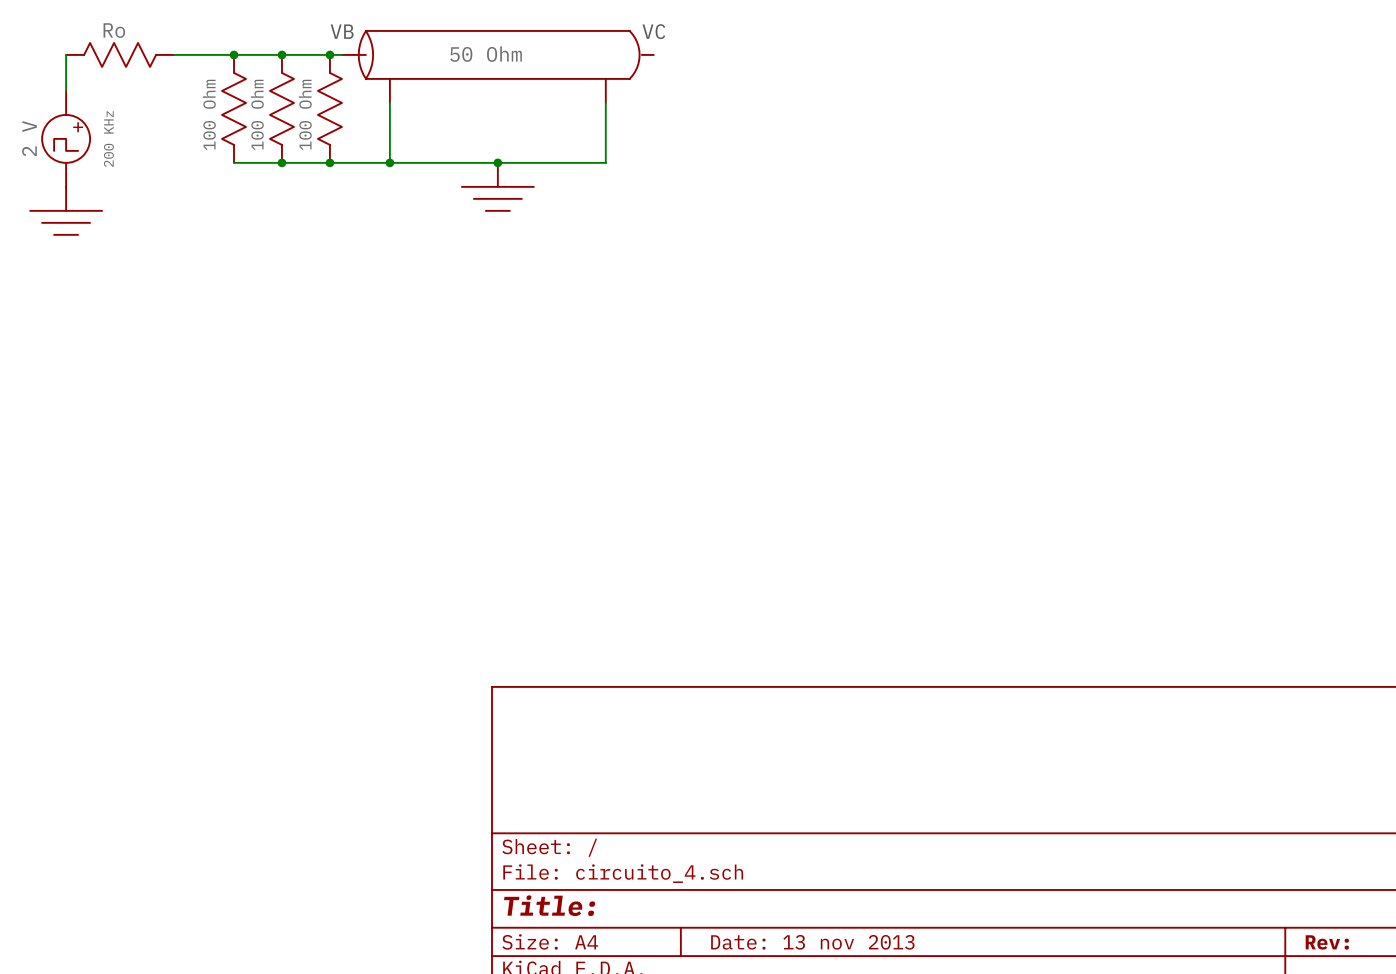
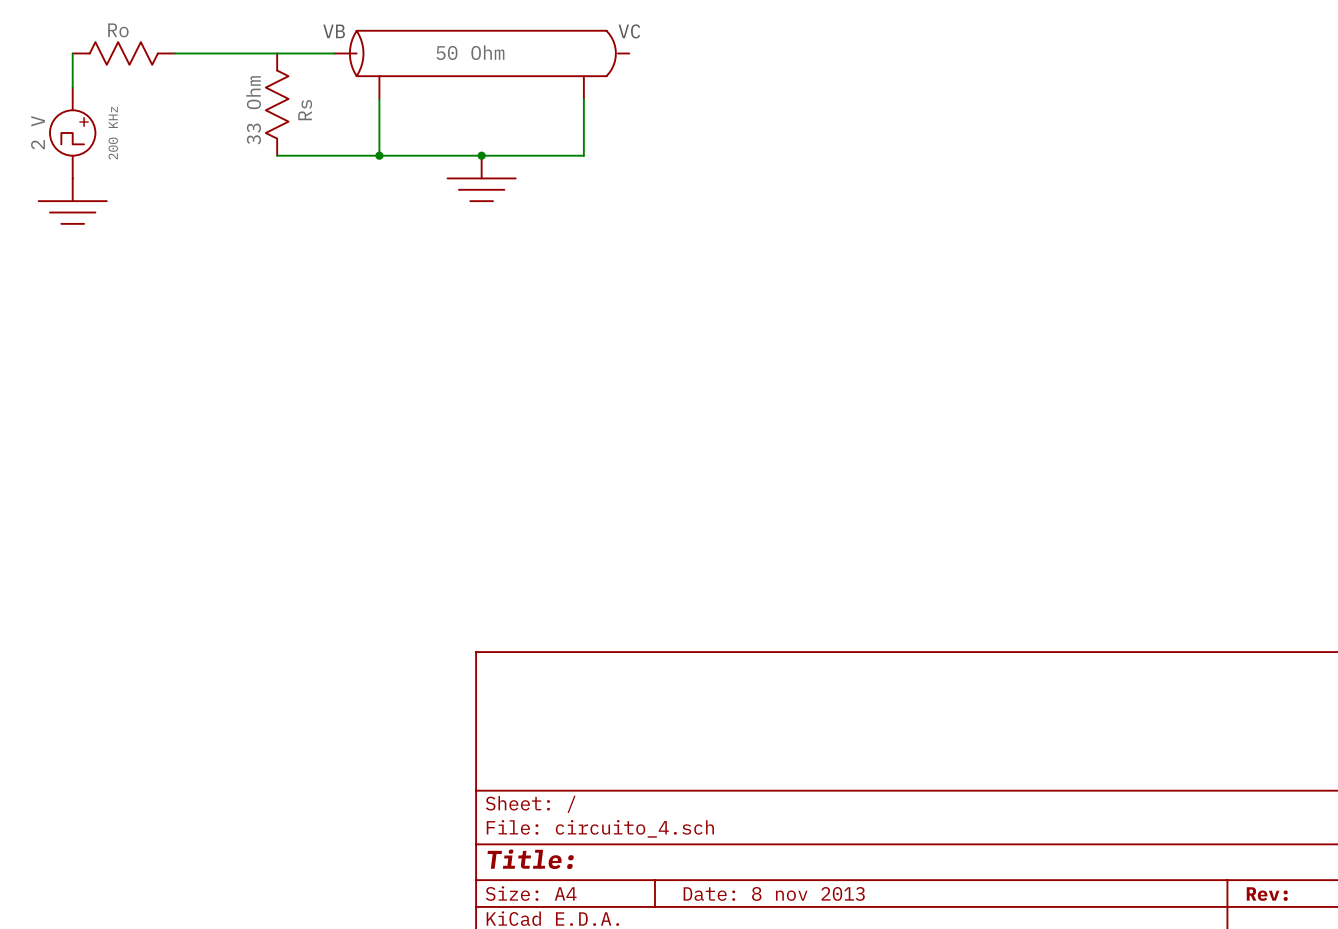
junction: (234, 54) -> none
junction: (281, 54) -> none
junction: (329, 54) -> none
100 Ohm: (234, 108) -> none
100 Ohm: (329, 108) -> none
100 Ohm name: 100 Ohm (257, 114) -> 33 Ohm (253, 110)
100 Ohm value: none -> Rs (305, 110)
wire: (234, 162) (281, 162) -> none
junction: (281, 162) -> none
junction: (329, 162) -> none
title block: Date: 13 nov 2013 (812, 942) -> Date: 8 nov 2013 (774, 893)

